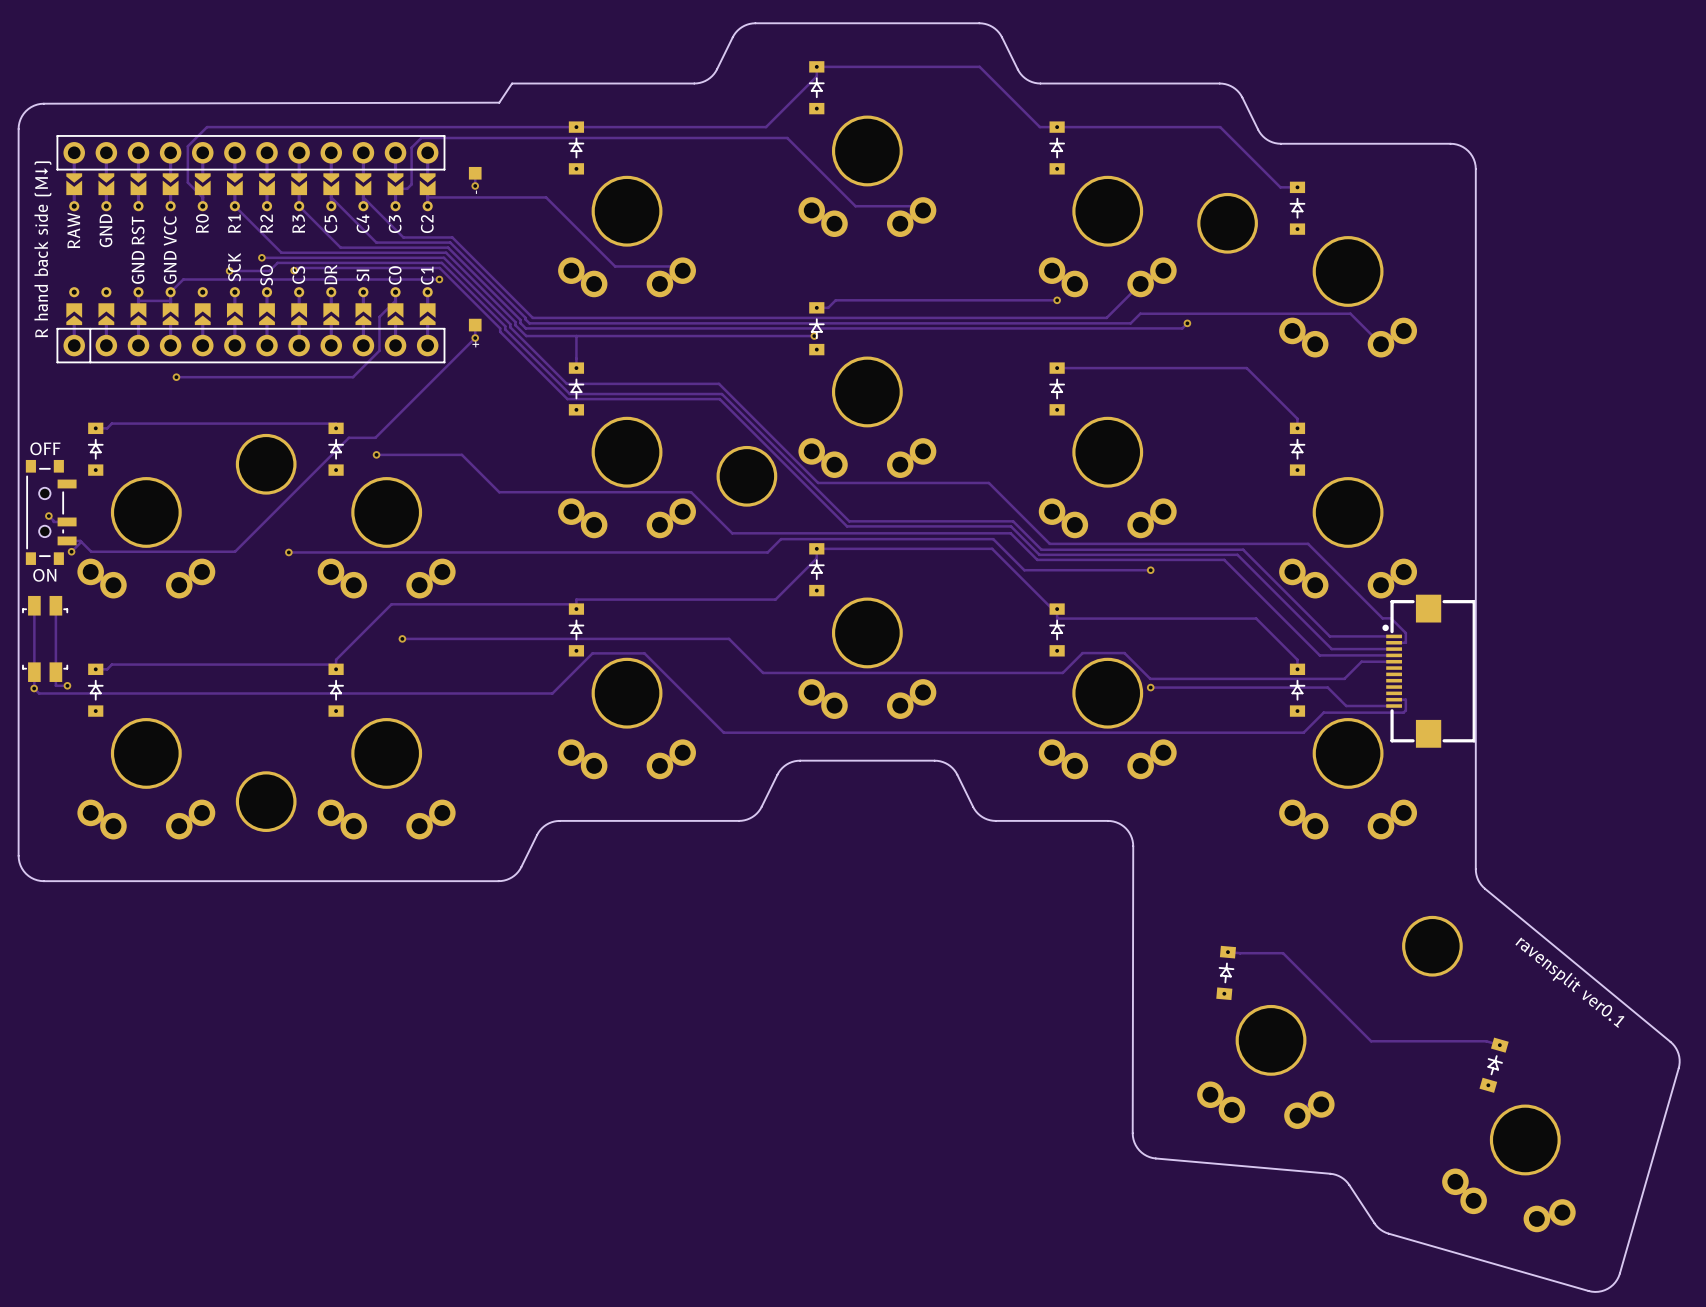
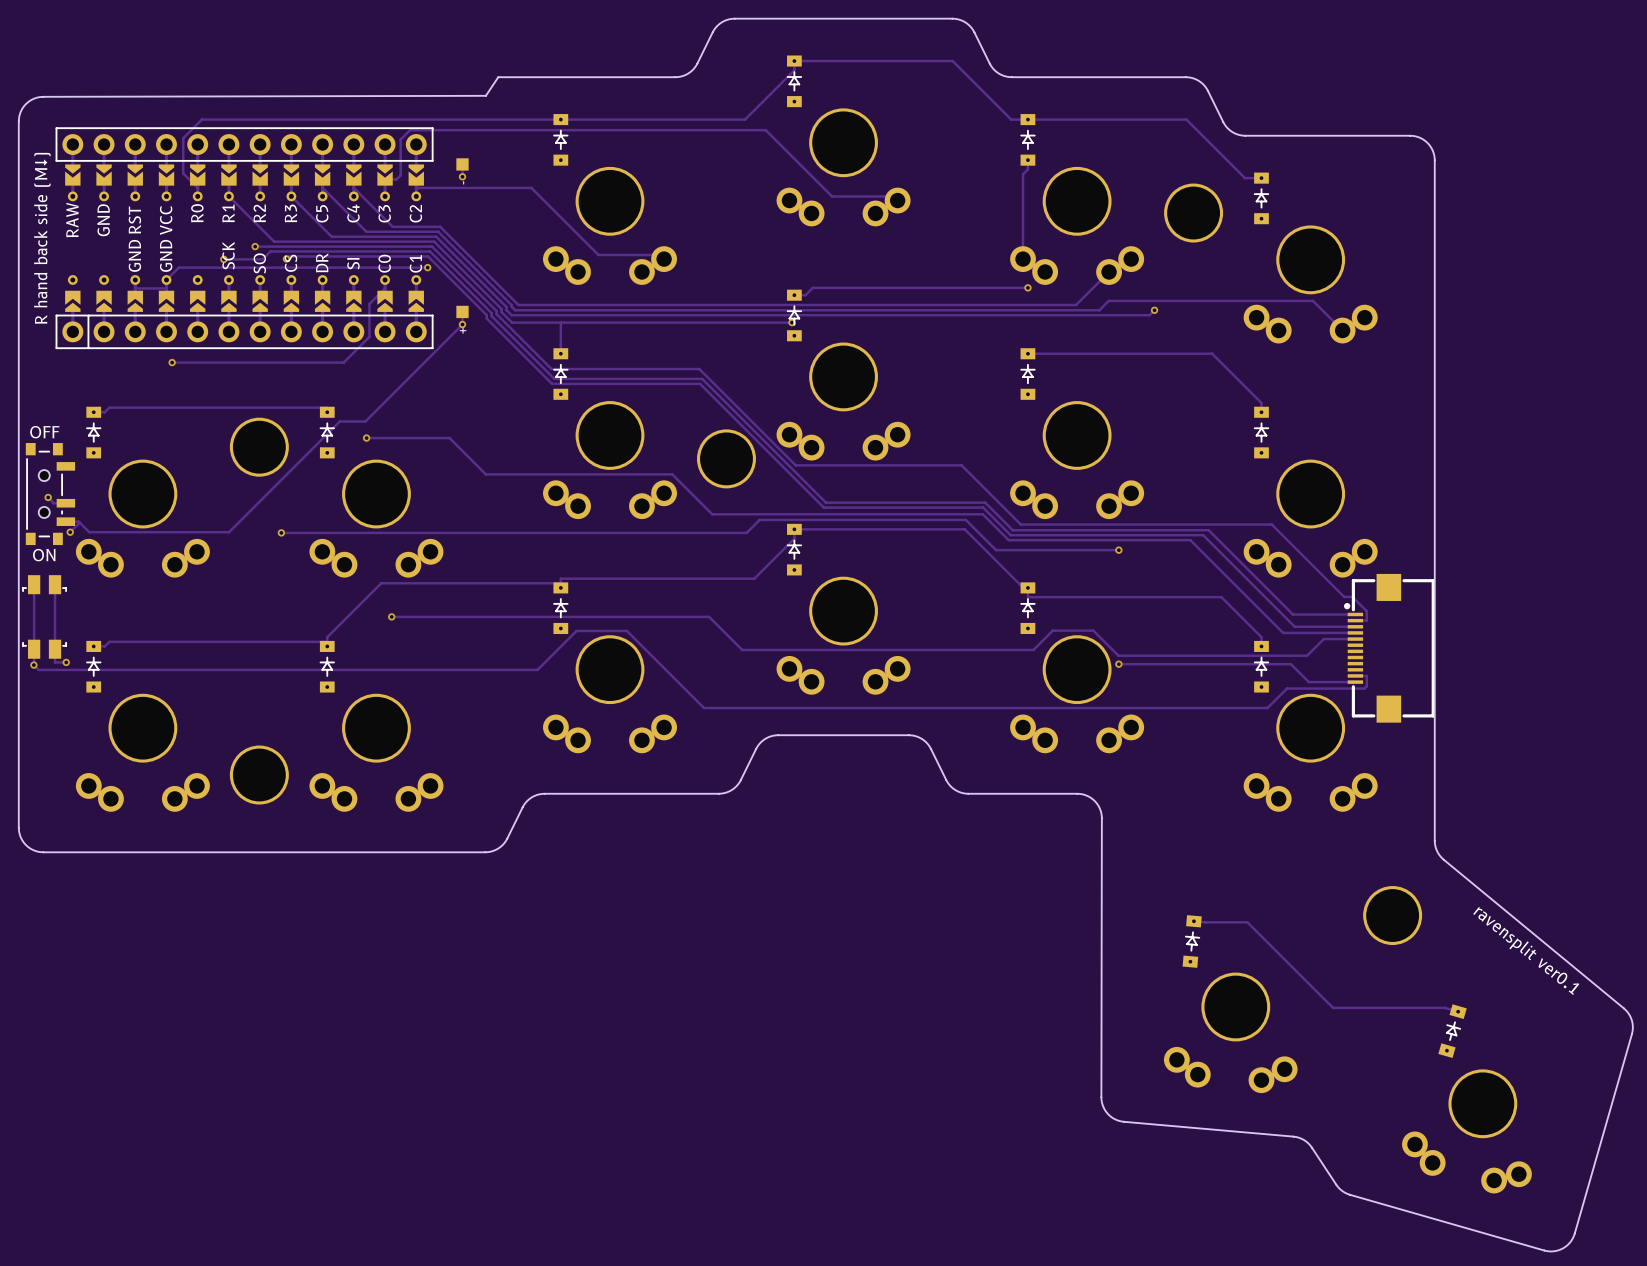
track: none -> (1027, 160) (1027, 169) (1023, 174) (1023, 259)

